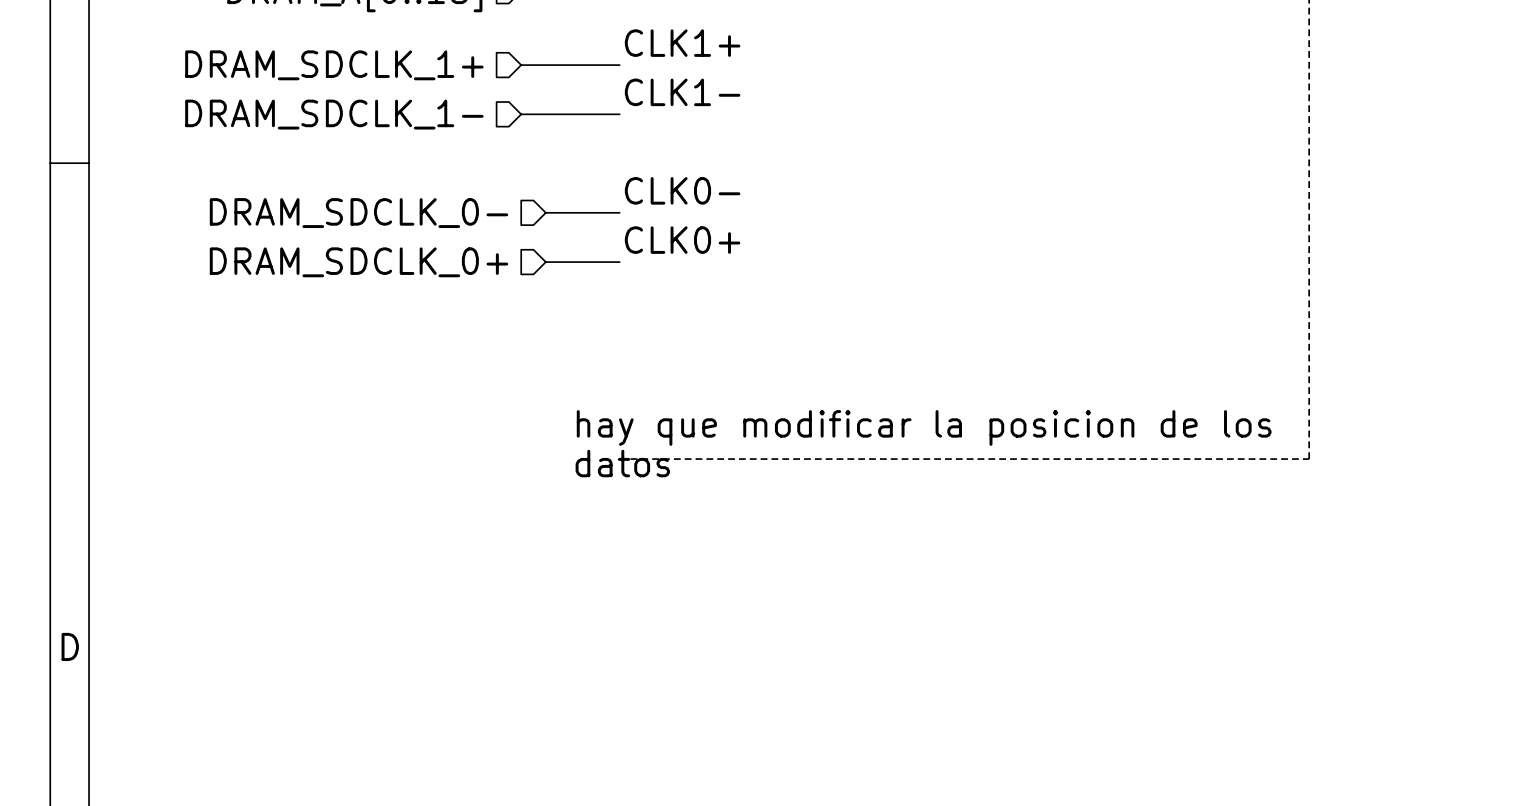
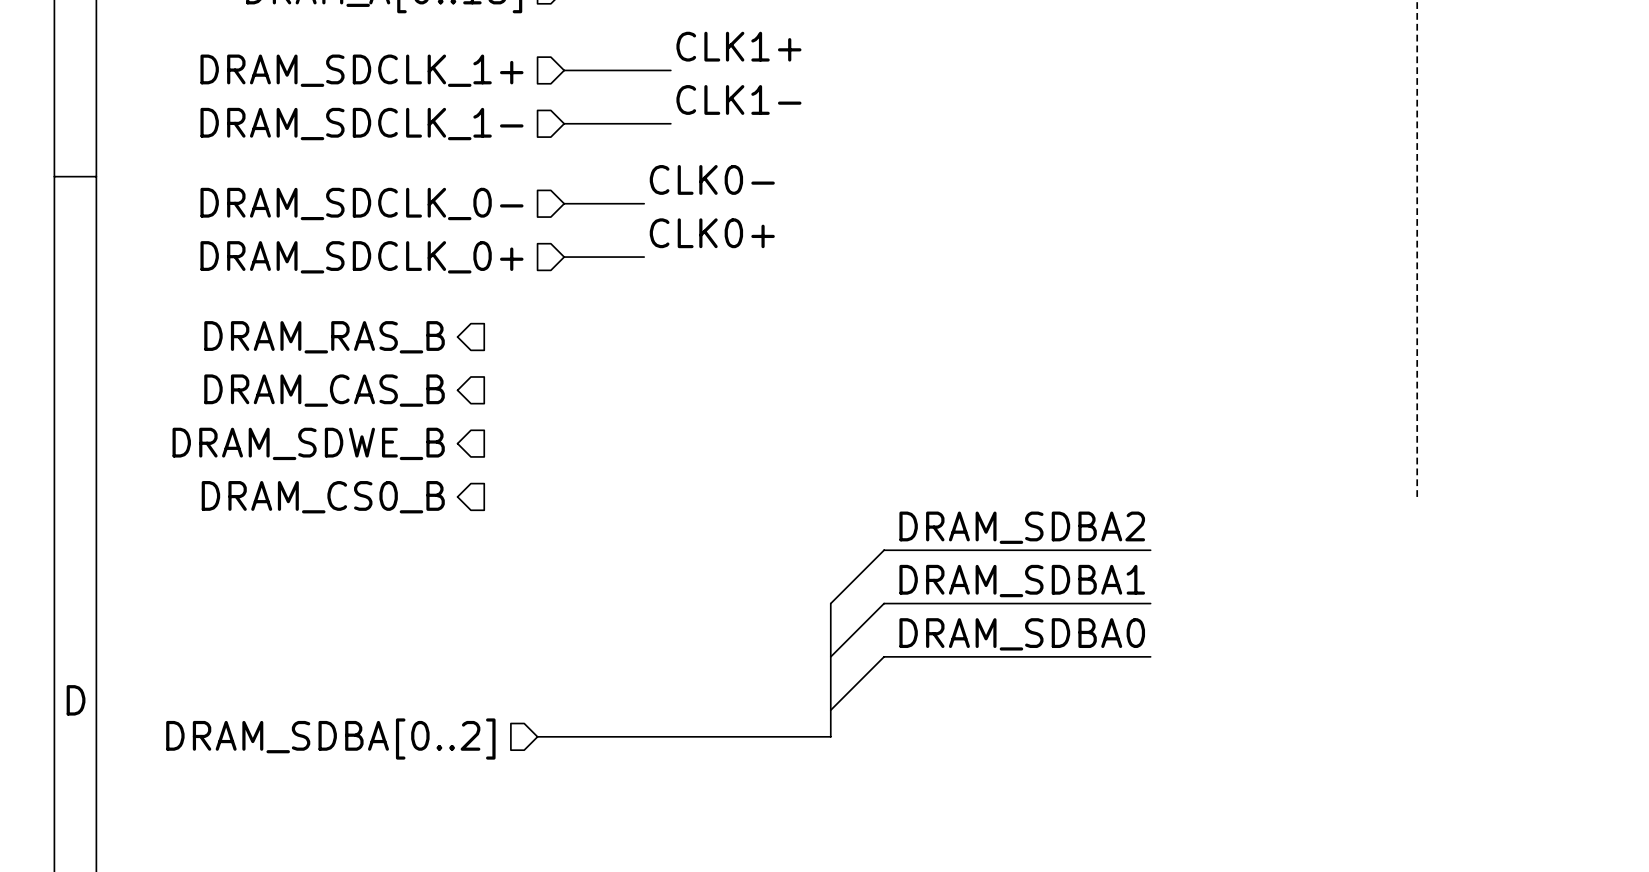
label position: CLK0- (682, 190) -> CLK0- (712, 179)
wire: (545, 212) (619, 212) -> (564, 203) (644, 203)
hierarchical label position: DRAM_SDCLK_0- (359, 213) -> DRAM_SDCLK_0- (361, 204)
label position: CLK0+ (682, 240) -> CLK0+ (712, 233)
hierarchical label position: DRAM_SDCLK_0+ (359, 262) -> DRAM_SDCLK_0+ (361, 257)
wire: (545, 262) (619, 262) -> (564, 257) (644, 257)
hierarchical label: none -> DRAM_RAS_B (324, 337)
hierarchical label: none -> DRAM_CAS_B (324, 390)
hierarchical label: none -> DRAM_SDWE_B (308, 443)
text: hay que modificar la posicion de los (924, 427) -> none
hierarchical label: none -> DRAM_CS0_B (323, 497)
line: (619, 459) (1309, 459) -> none
text: datos (622, 463) -> none
label: none -> DRAM_SDBA2 (1022, 527)
wire: none -> (1150, 550) (884, 550) (830, 603)
label: none -> DRAM_SDBA1 (1022, 581)
bus: none -> (830, 603) (830, 736) (537, 736)
wire: none -> (1150, 603) (884, 603) (830, 656)
label: none -> DRAM_SDBA0 (1022, 634)
wire: none -> (1150, 656) (884, 656) (830, 710)
hierarchical label: none -> DRAM_SDBA[0..2] (330, 739)

